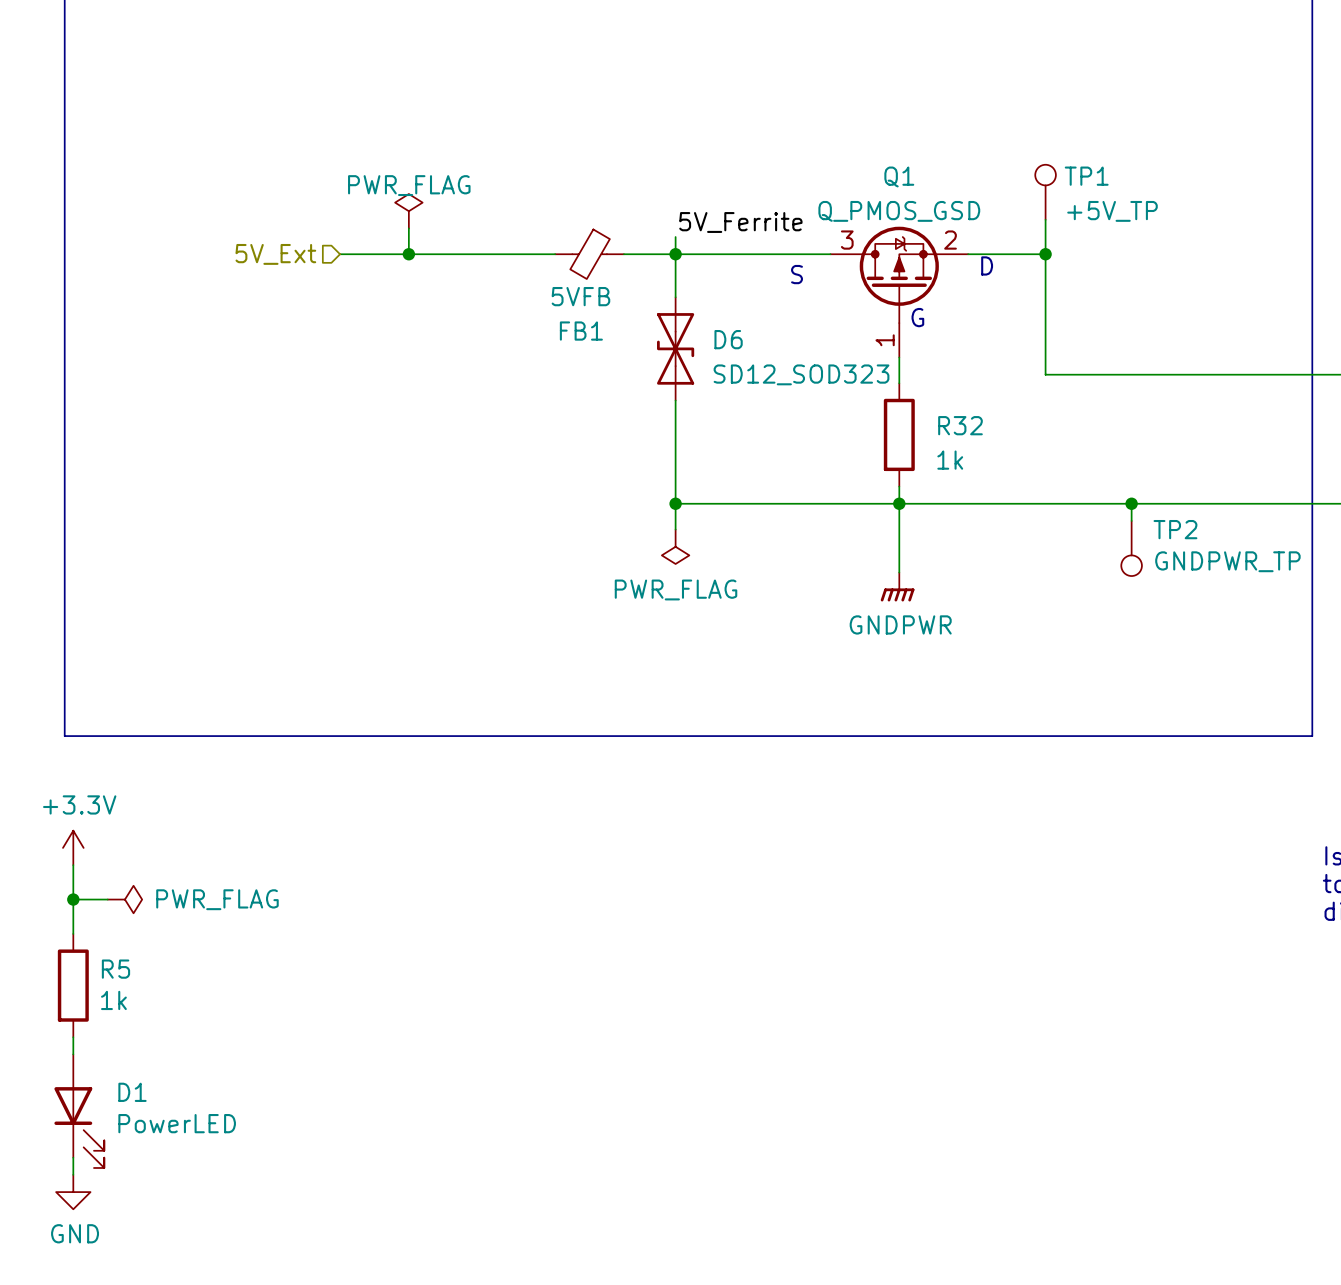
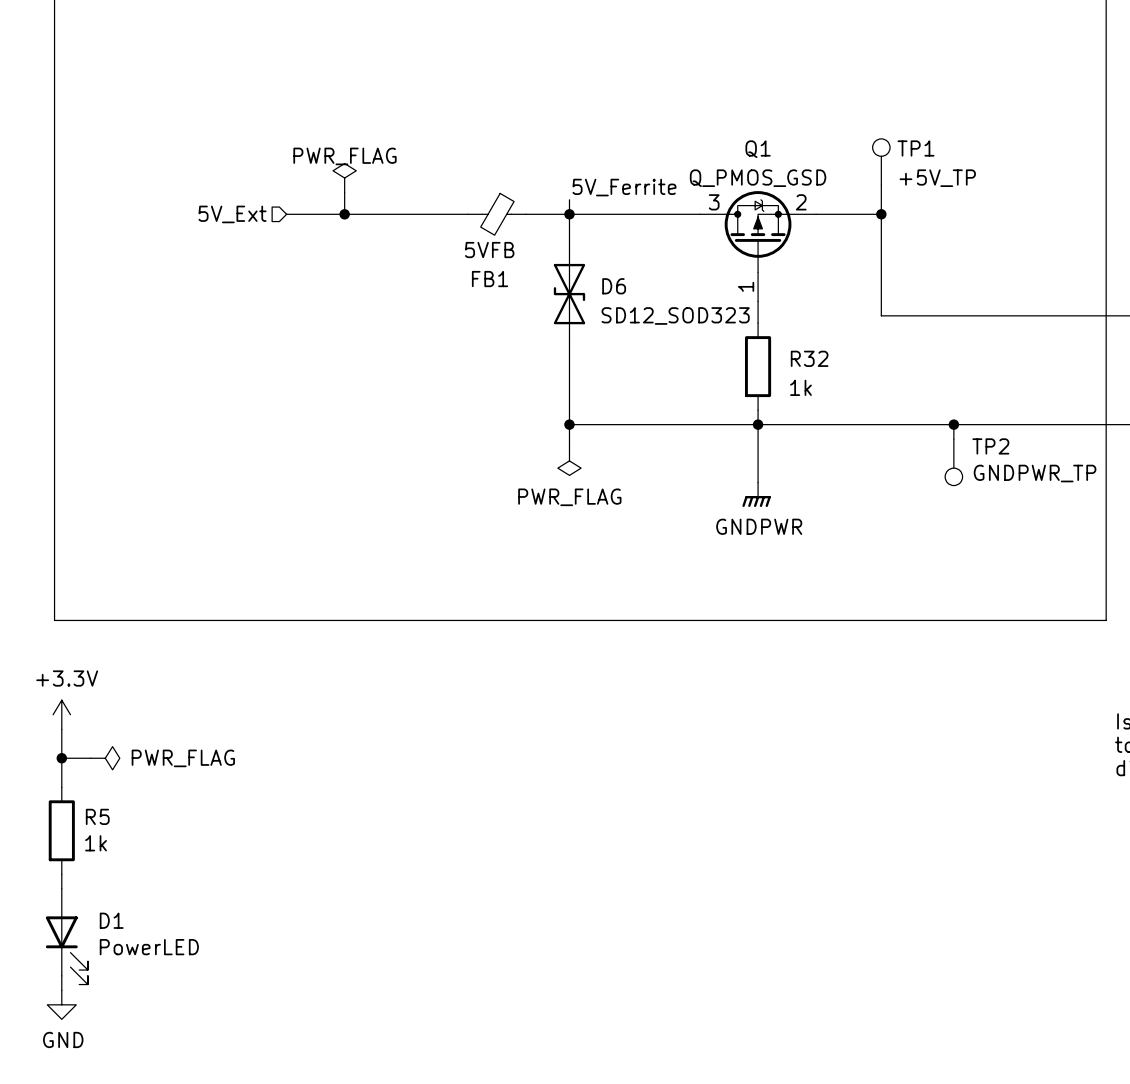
text: D (987, 265) -> none
text: S (797, 274) -> none
text: G (917, 317) -> none

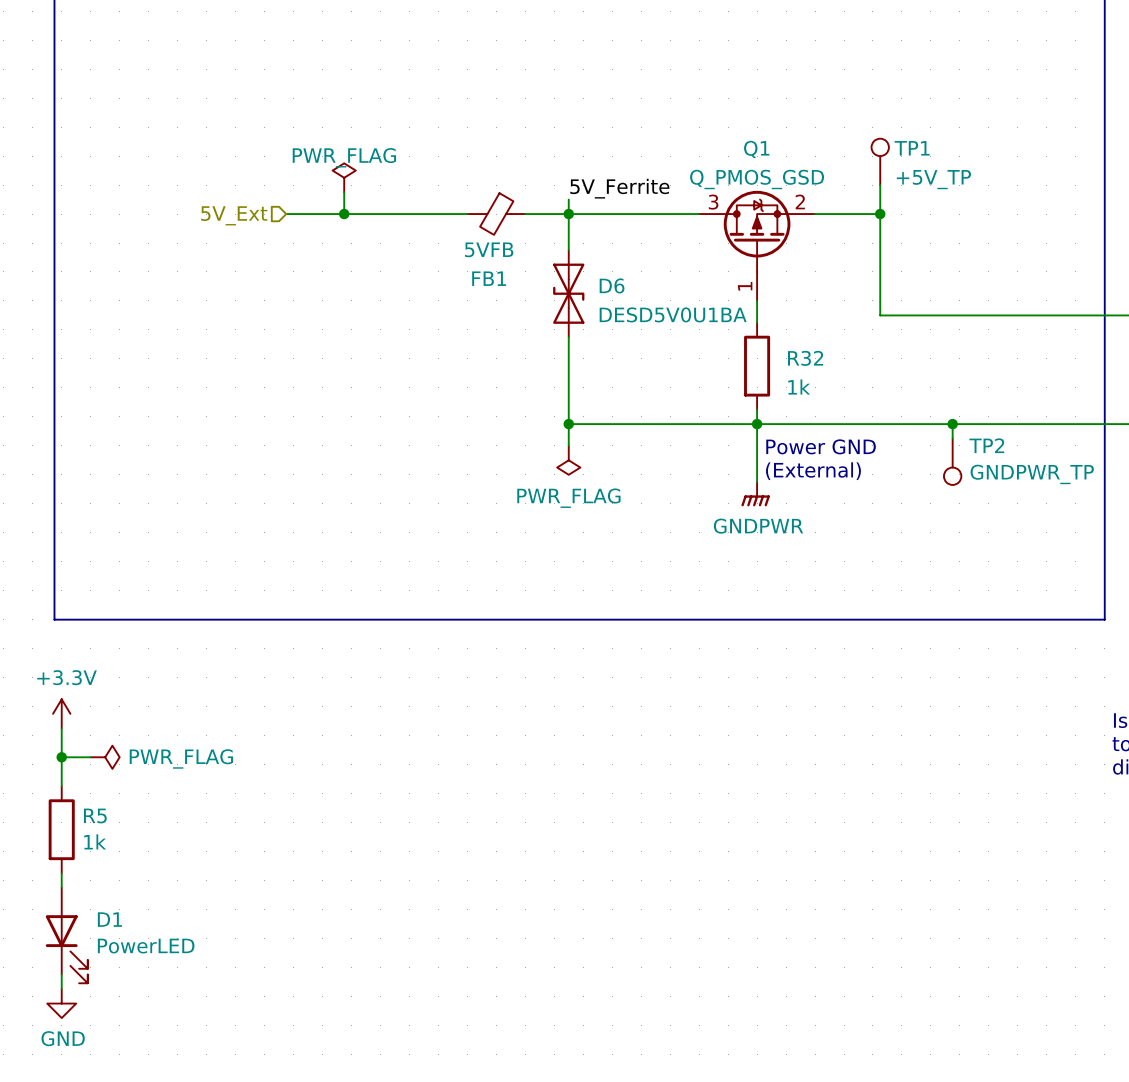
D6 value: SD12_SOD323 (675, 315) -> DESD5V0U1BA (673, 314)
text: none -> Power GND (821, 446)
text: none -> (External) (813, 471)

